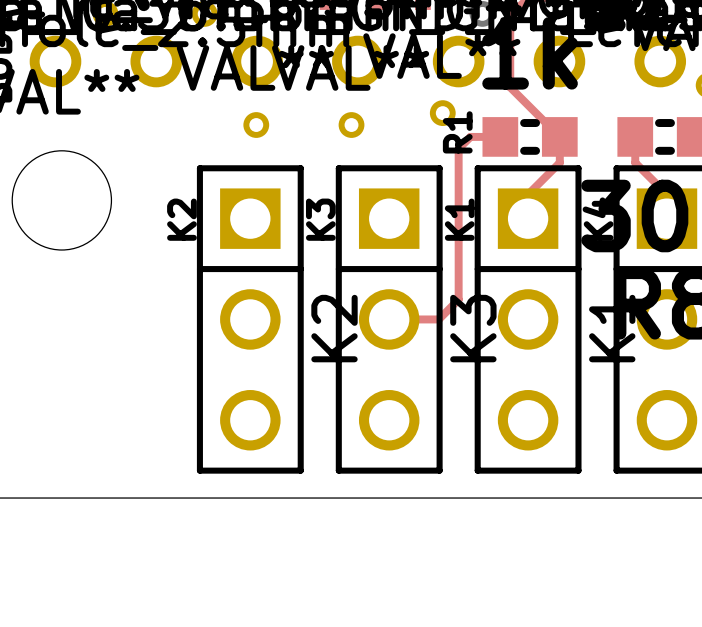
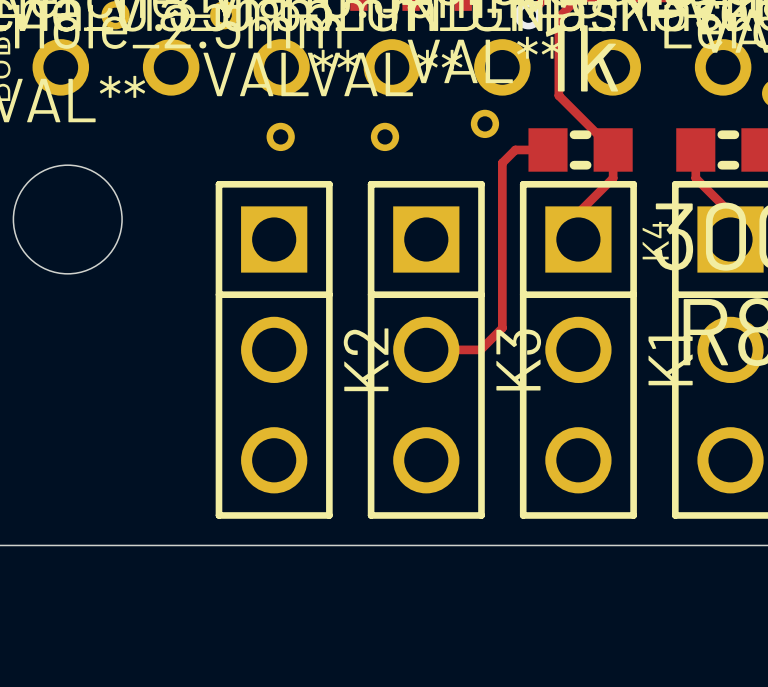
text: R1 (457, 132) -> none
text: K2 (181, 219) -> none
text: K3 (320, 219) -> none
text: K1 (459, 219) -> none

